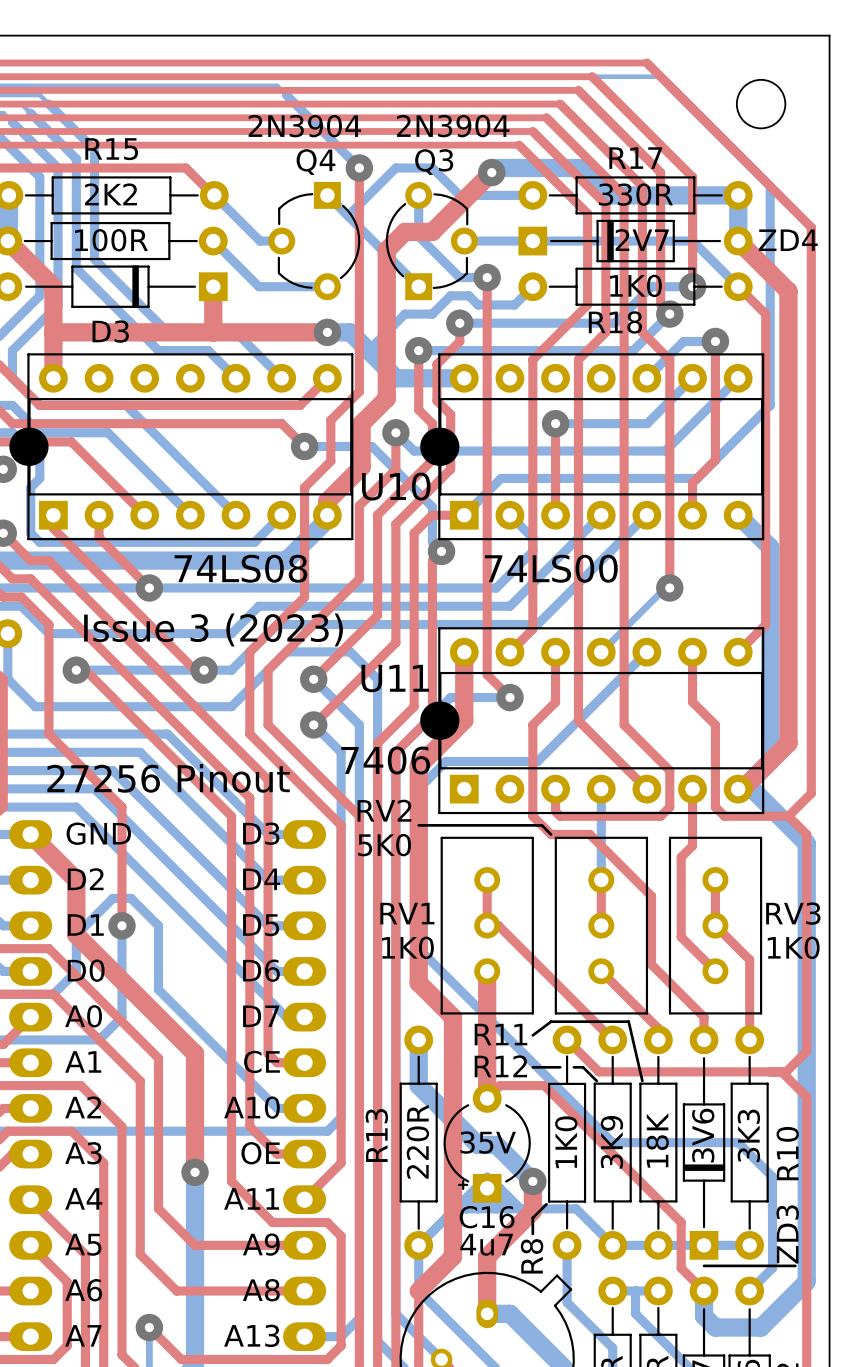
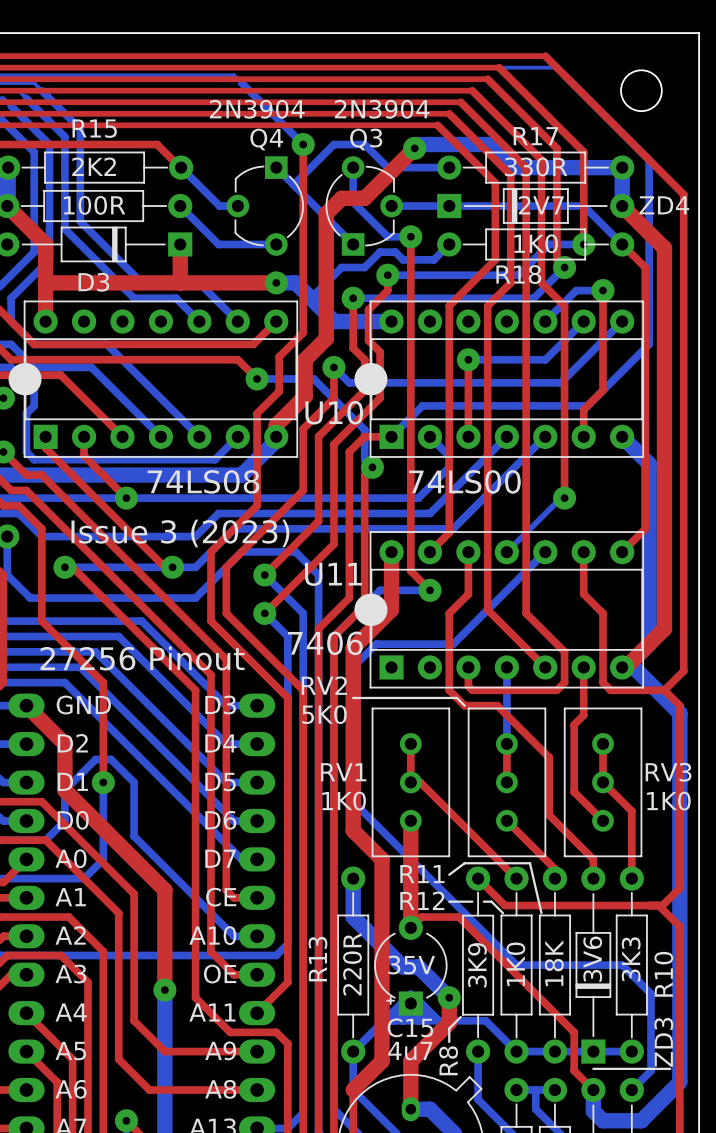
R8 value position: 1K0 (566, 1142) -> 1K0 (515, 964)
R12 value position: 3K9 (611, 1142) -> 3K9 (477, 965)
C16 name: C16 (487, 1217) -> C15 (410, 1027)

